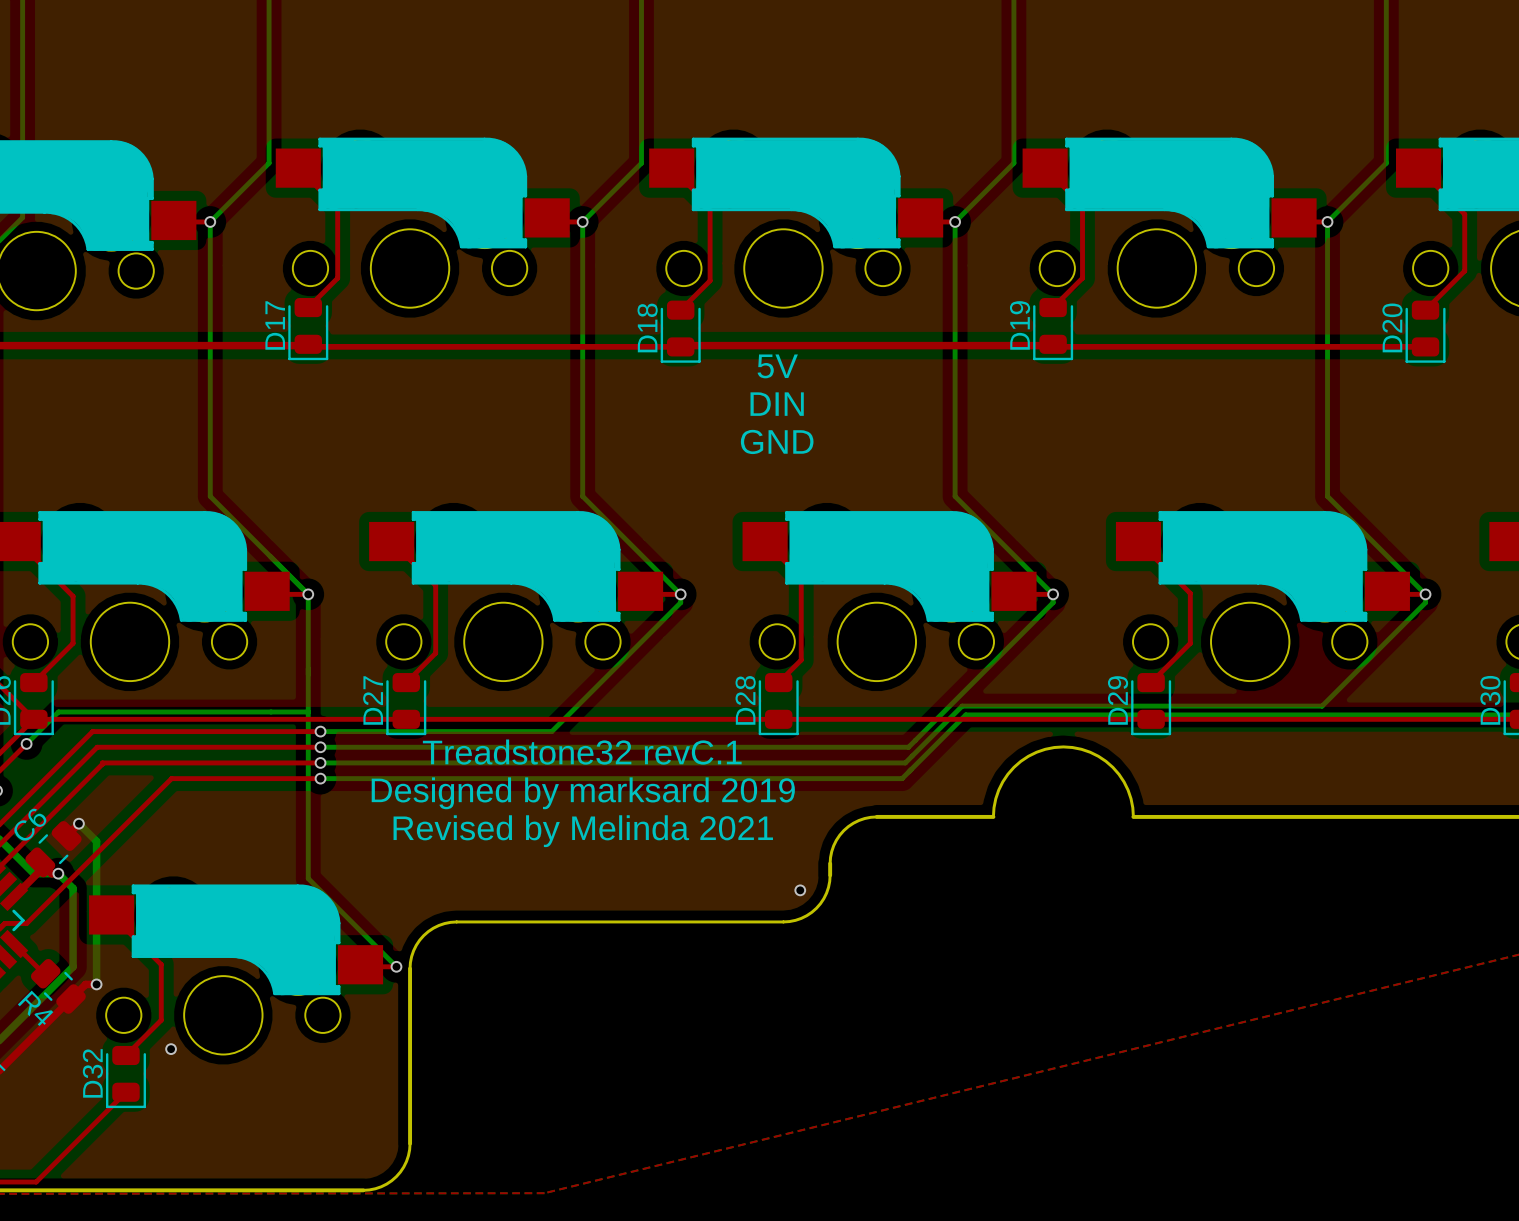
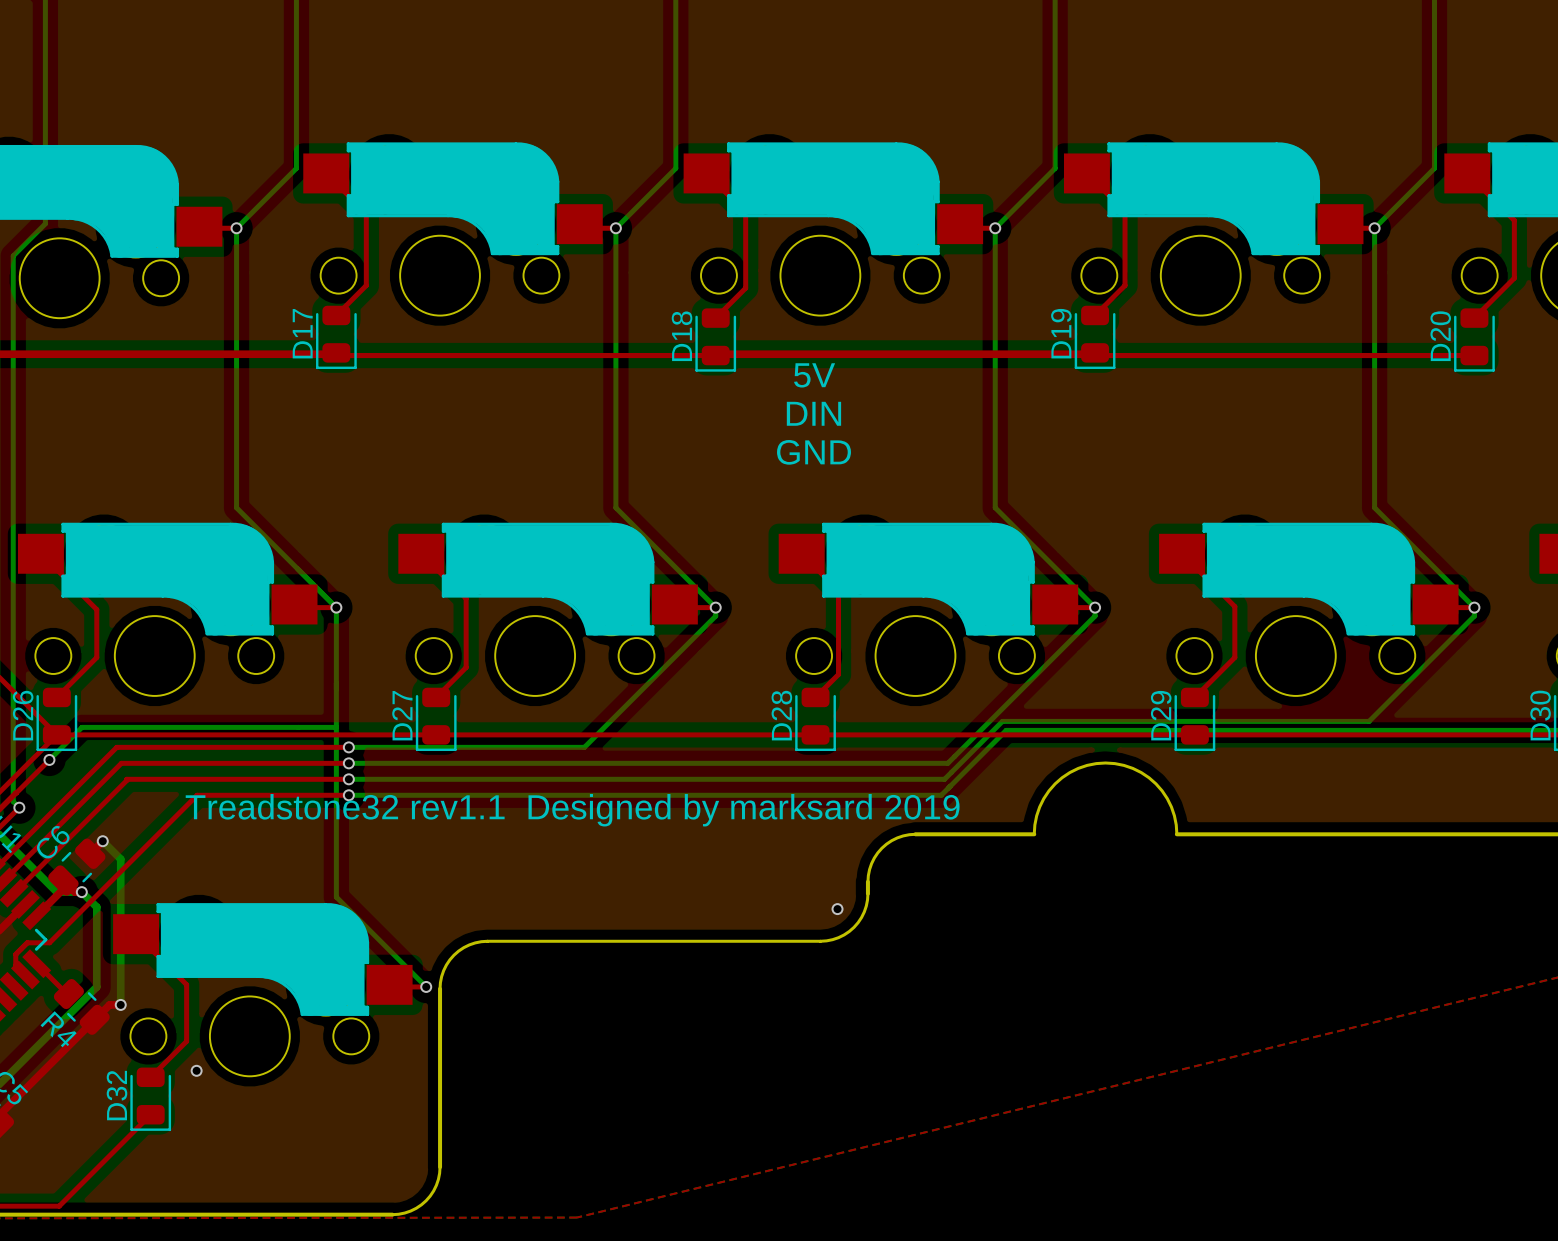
text: Treadstone32 revC.1 (582, 752) -> none
text: Designed by marksard 2019 (583, 793) -> Treadstone32 rev1.1 Designed by marksard 2019 (572, 810)
text: Revised by Melinda 2021 (583, 831) -> none

